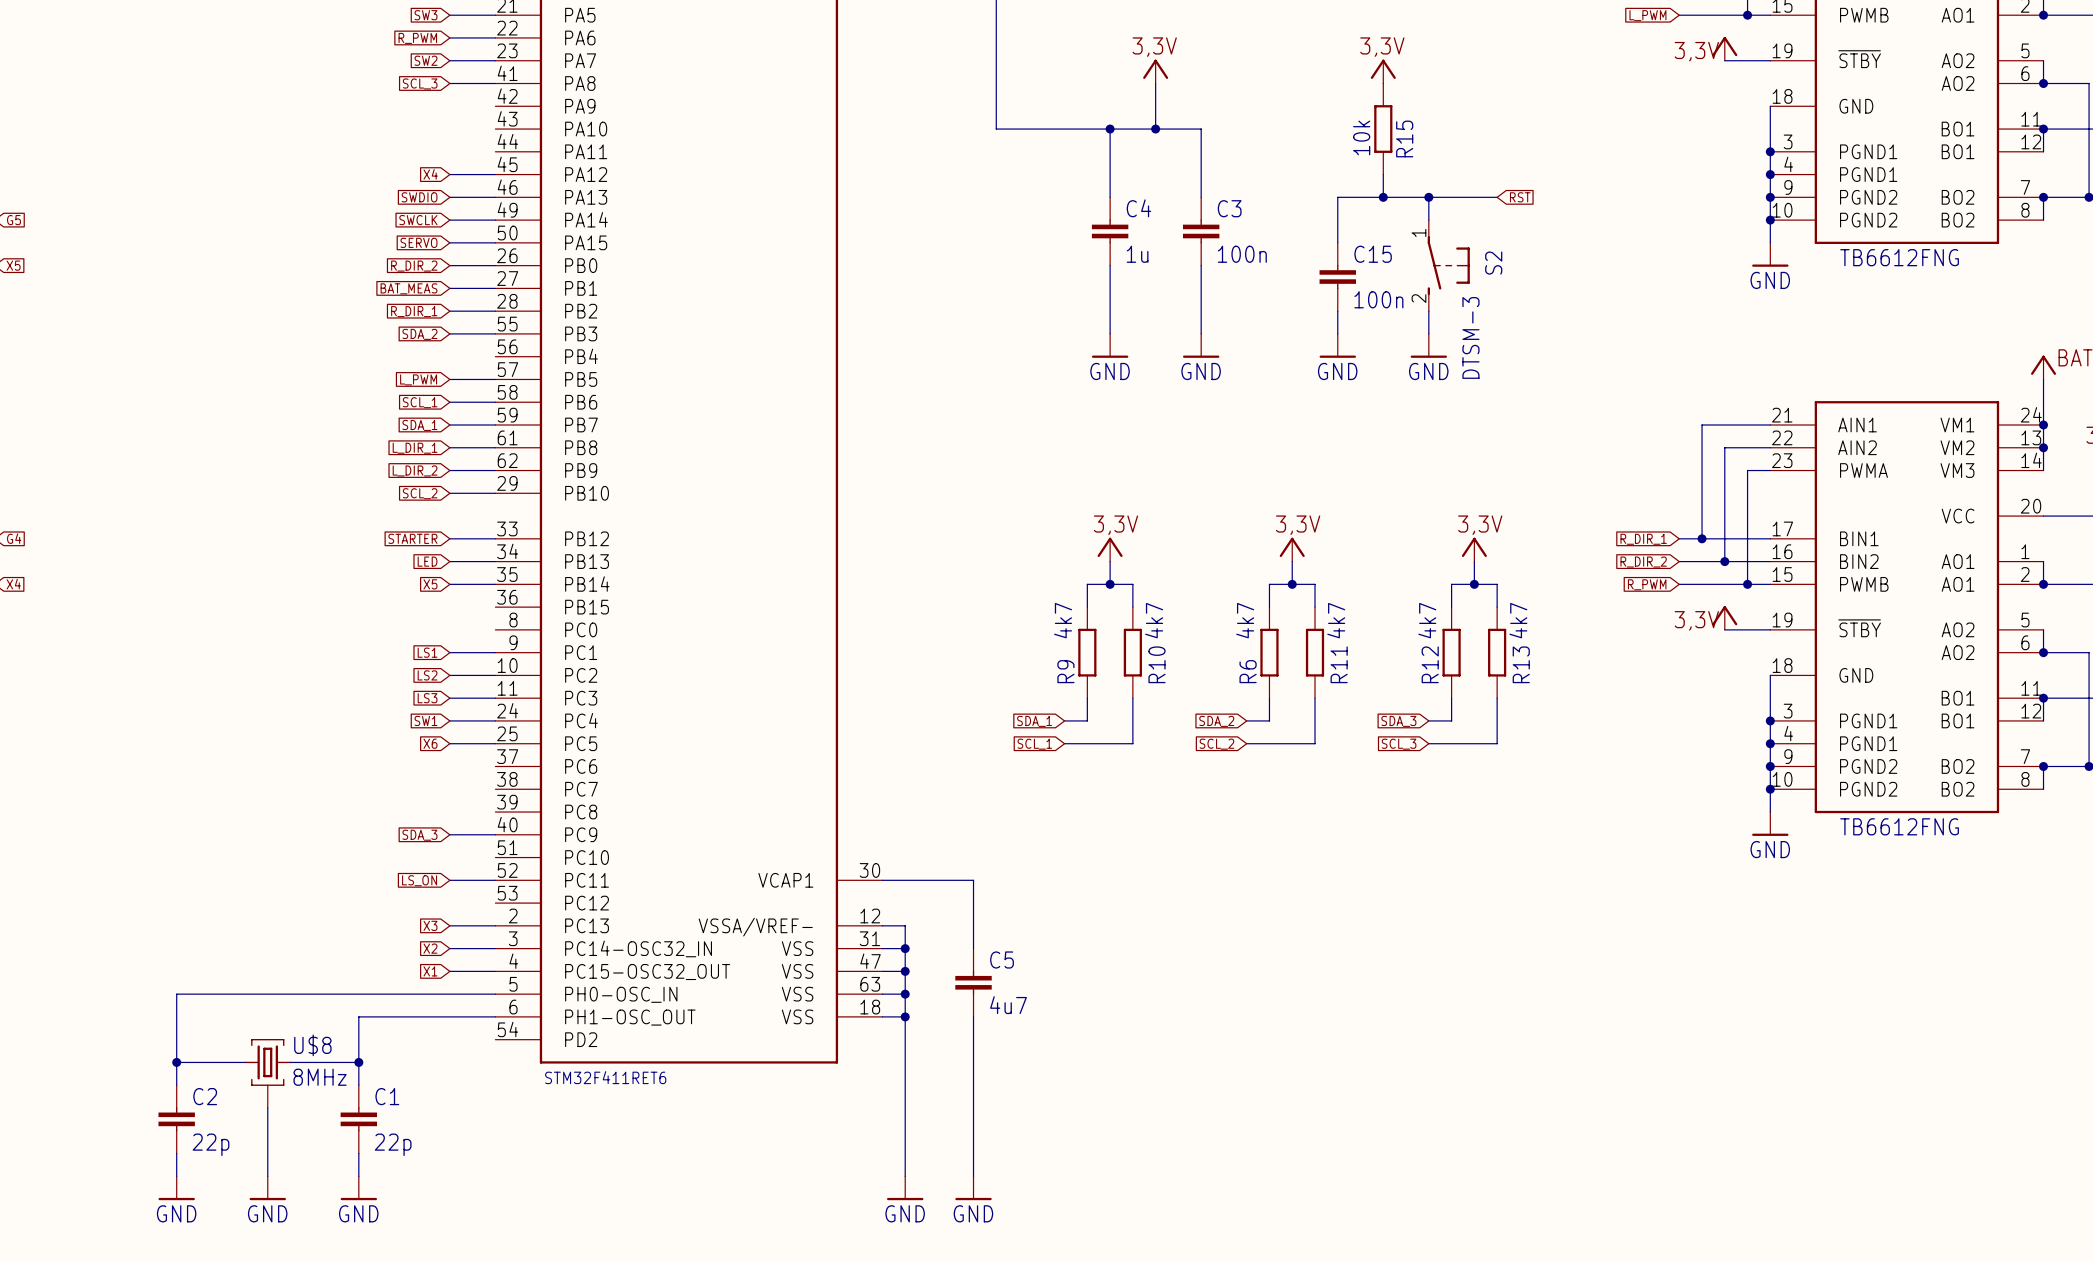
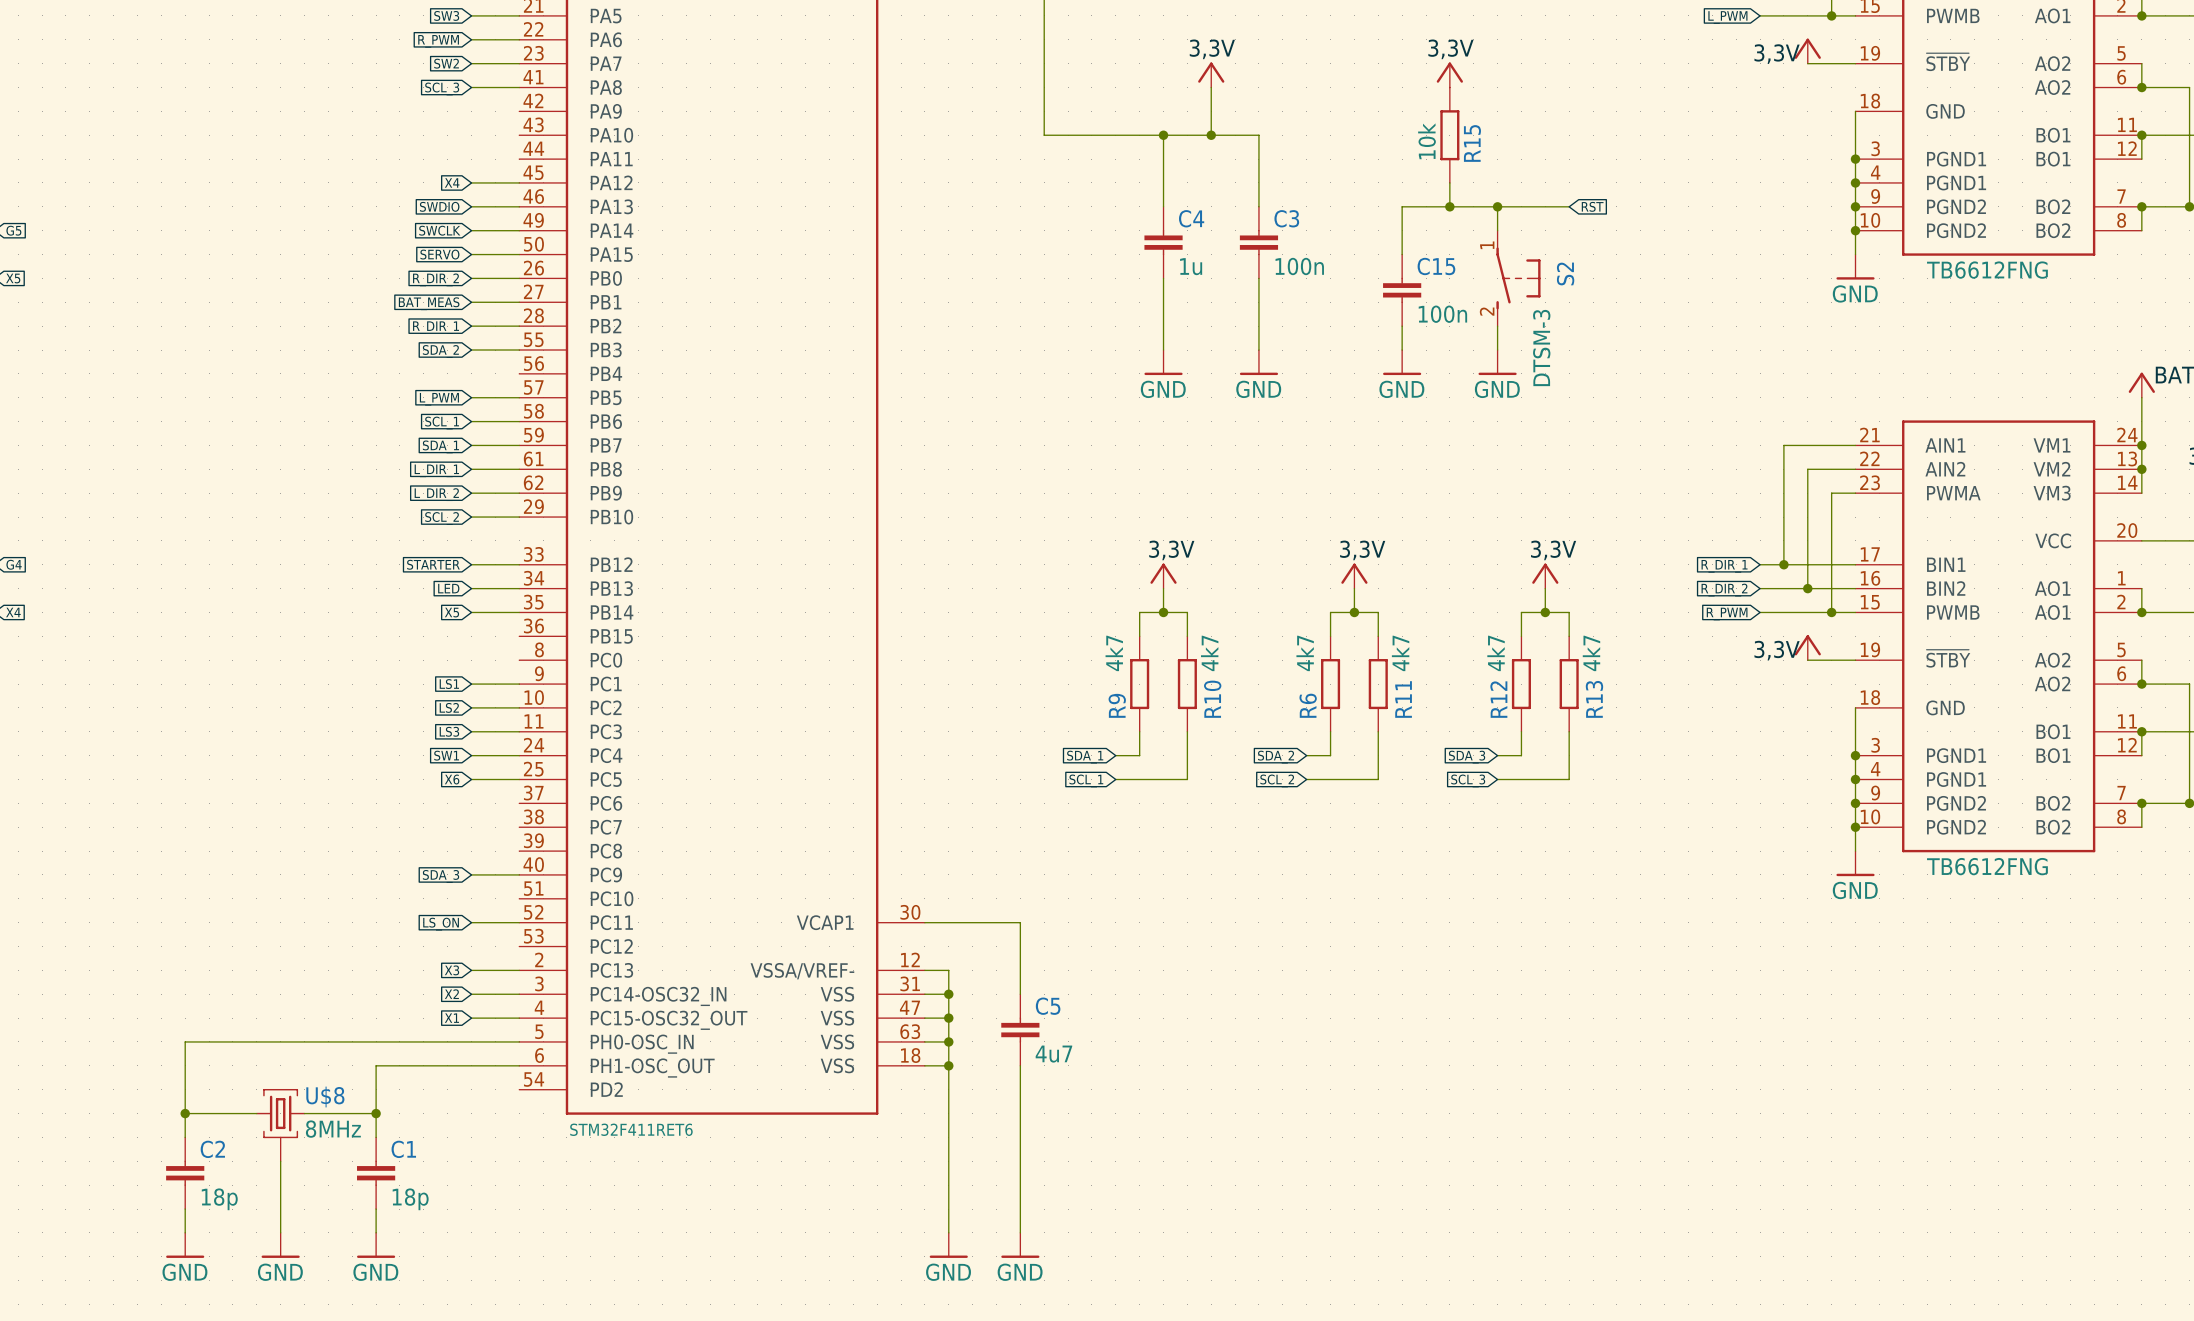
C2 value: 22p (211, 1144) -> 18p (219, 1199)
C1 value: 22p (393, 1144) -> 18p (410, 1199)

